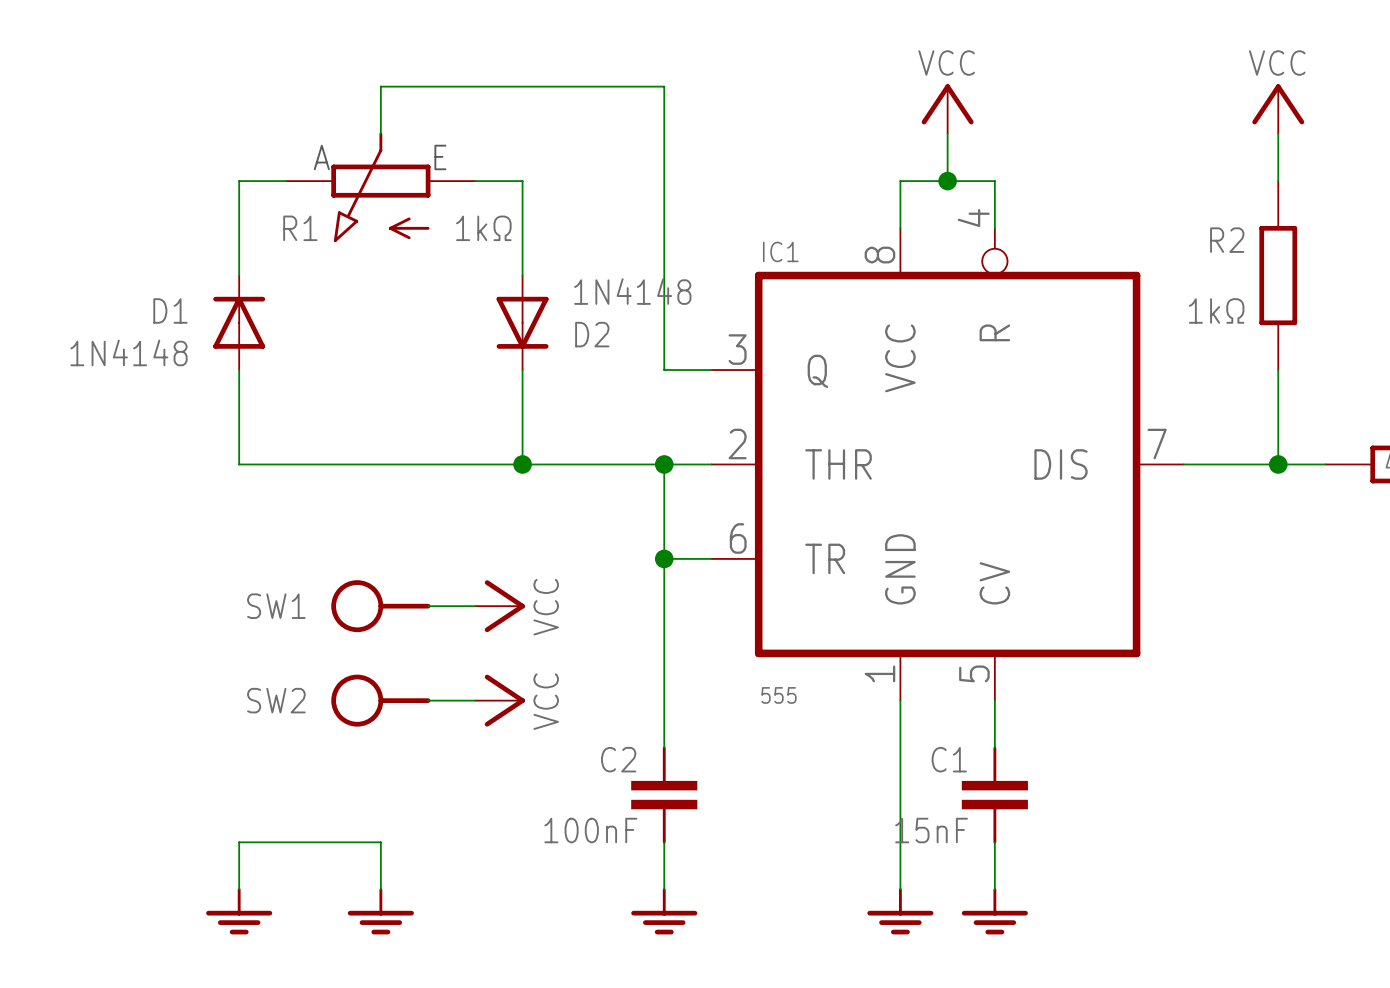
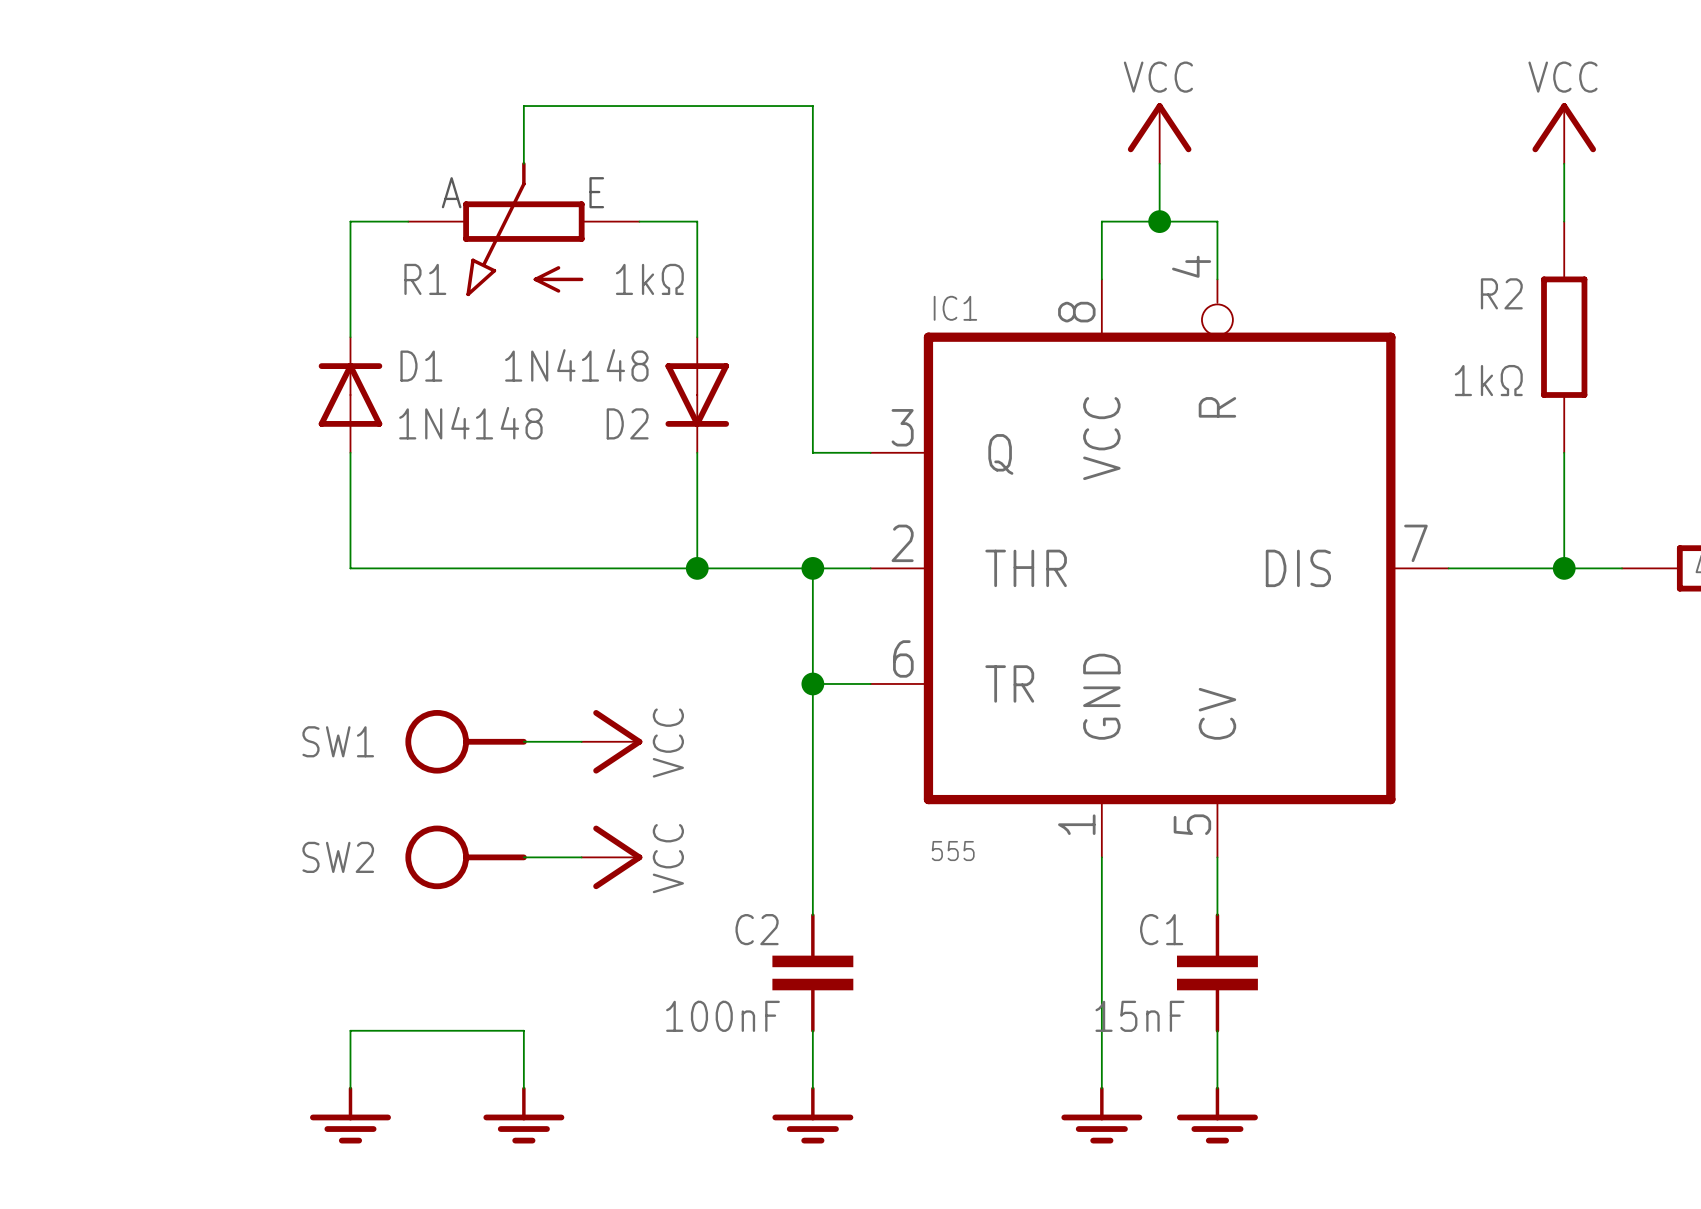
wire: (428, 86) (380, 86) (380, 133) -> (523, 106) (523, 163)
wire: (286, 181) (239, 181) (239, 275) -> (408, 221) (350, 221) (350, 337)
wire: (475, 181) (522, 181) (522, 275) -> (639, 221) (697, 221) (697, 337)
R1 position: (380, 187) -> (523, 229)
D2 value position: 1N4148 (632, 291) -> 1N4148 (576, 365)
D1 name position: D1 (170, 310) -> D1 (421, 366)
D1 position: (239, 322) -> (350, 395)
D2 position: (522, 322) -> (697, 395)
D2 name position: D2 (592, 334) -> D2 (627, 423)
D1 value position: 1N4148 (128, 352) -> 1N4148 (470, 423)
wire: (239, 370) (239, 464) (286, 464) -> (350, 452) (350, 568)
wire: (522, 370) (522, 464) -> (697, 452) (697, 568)
junction position: (522, 464) -> (697, 568)
wire: (286, 842) (239, 842) (239, 889) -> (350, 1030) (350, 1088)
wire: (380, 842) (380, 889) -> (466, 1030) (523, 1030) (523, 1088)
part position: (239, 911) -> (350, 1115)
power symbol position: (380, 911) -> (523, 1115)

